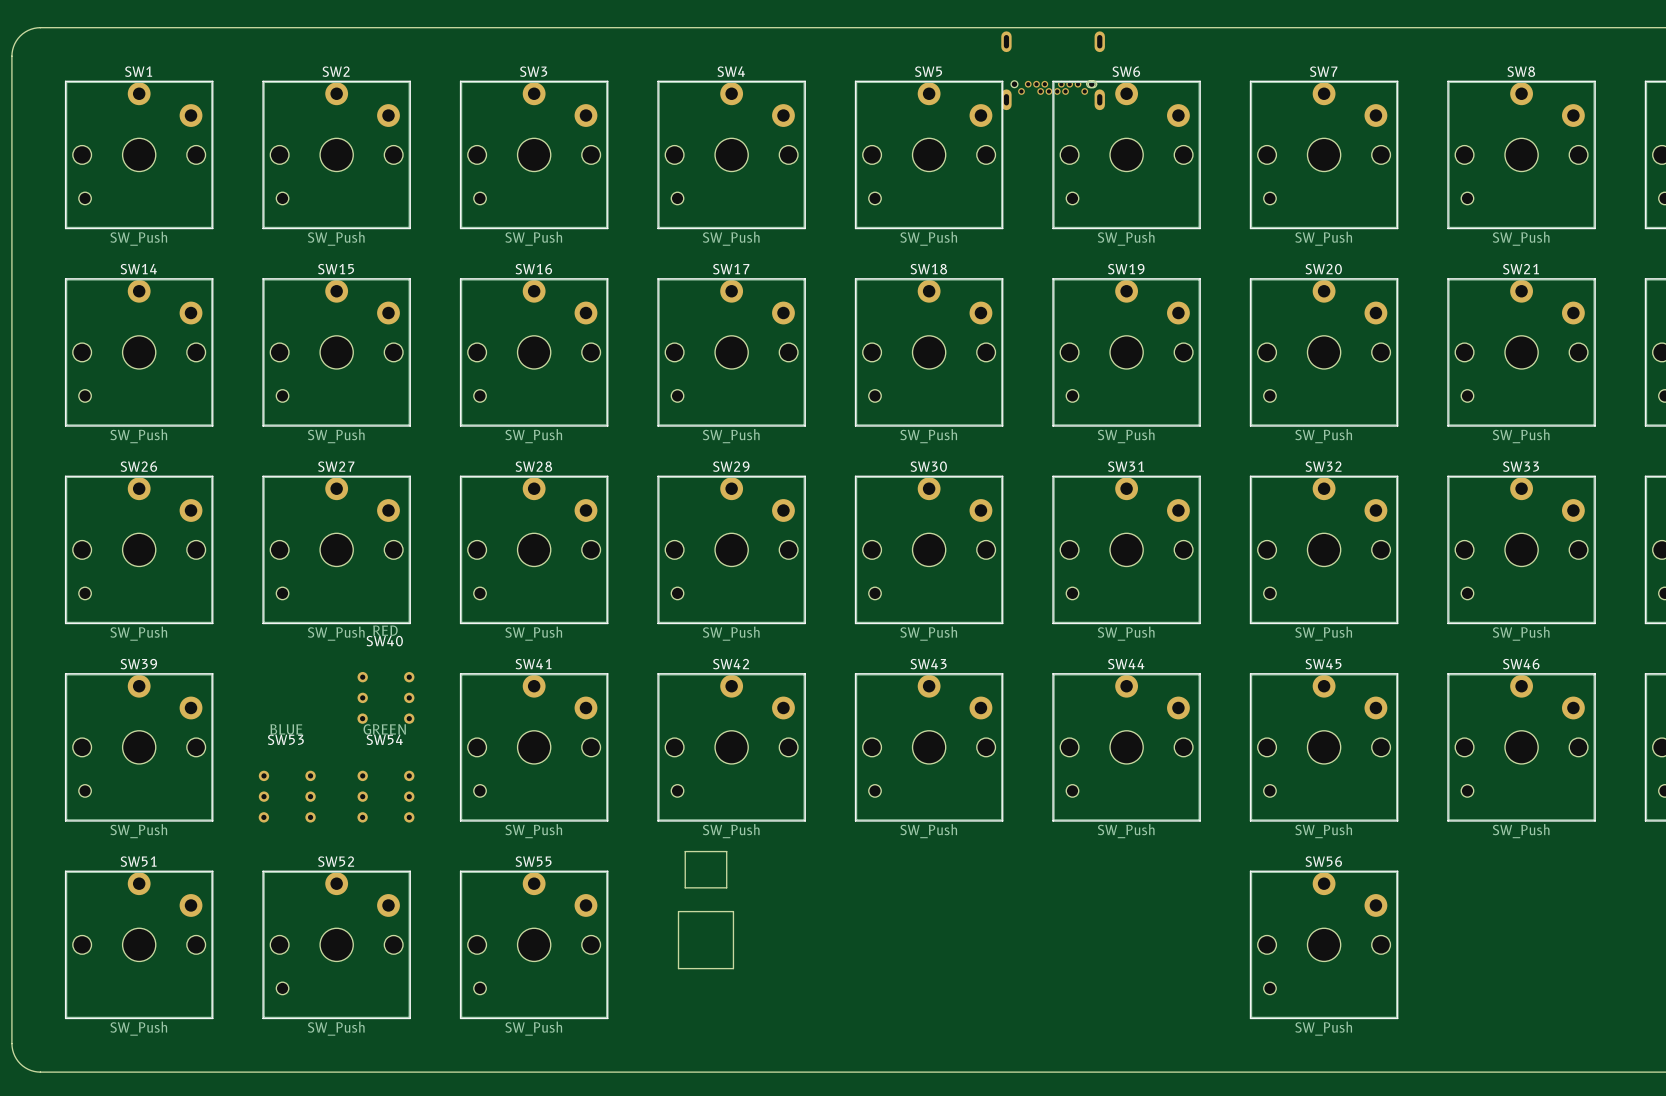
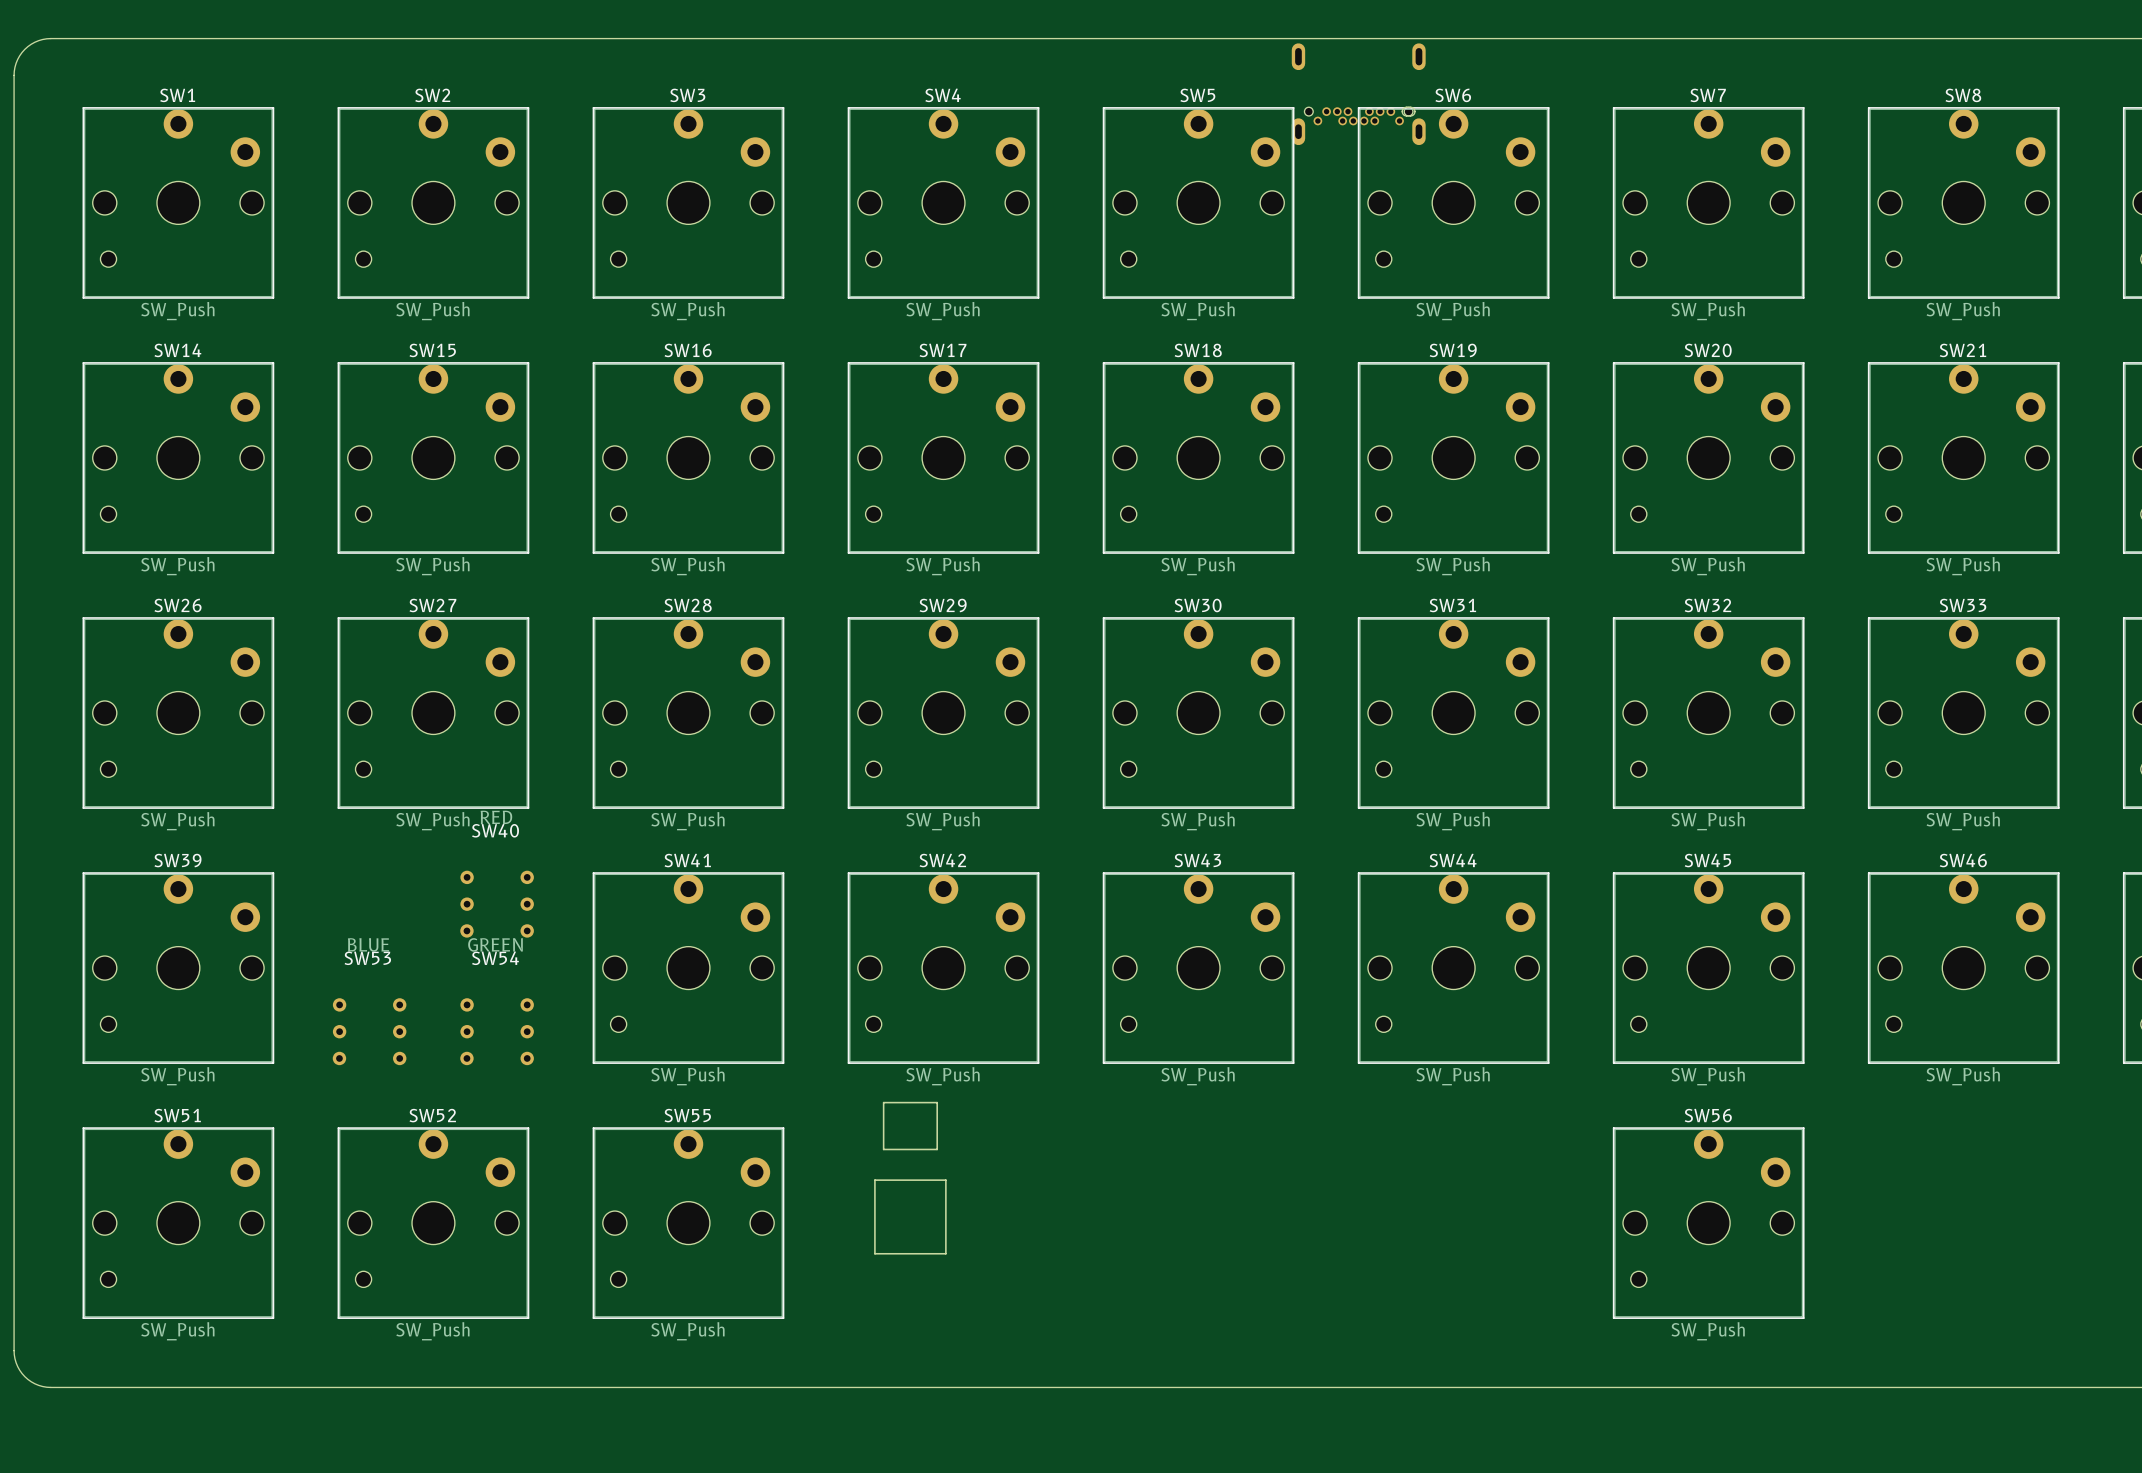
SW51 footprint: [64, 870, 214, 1020] -> [82, 1127, 275, 1319]

